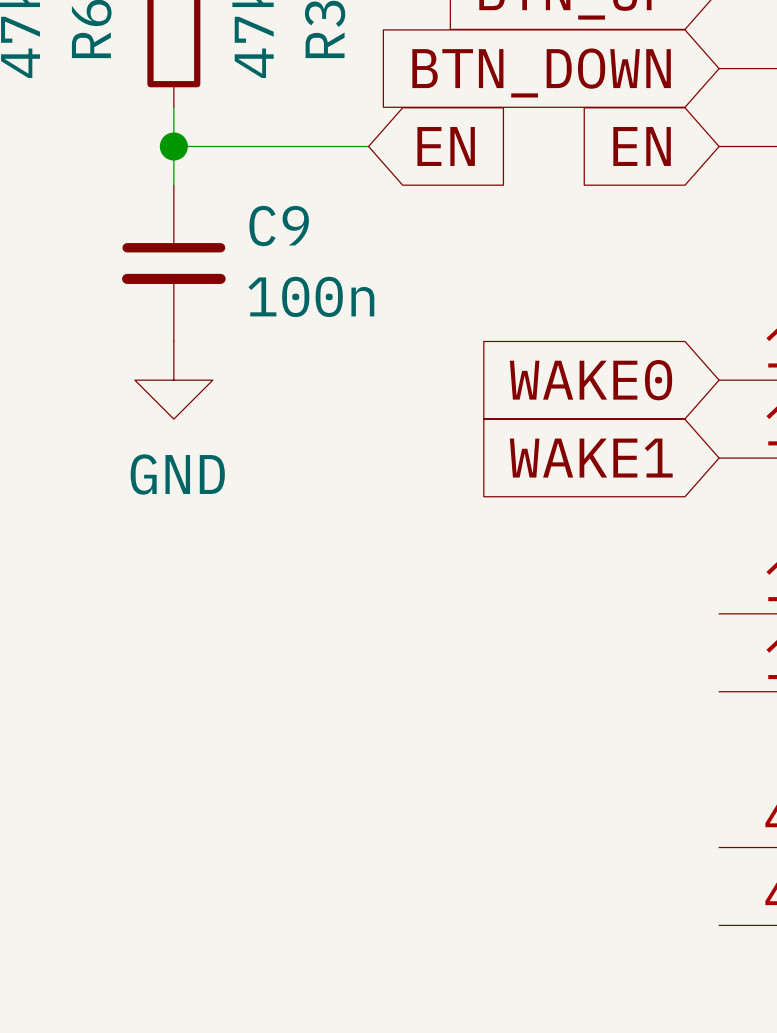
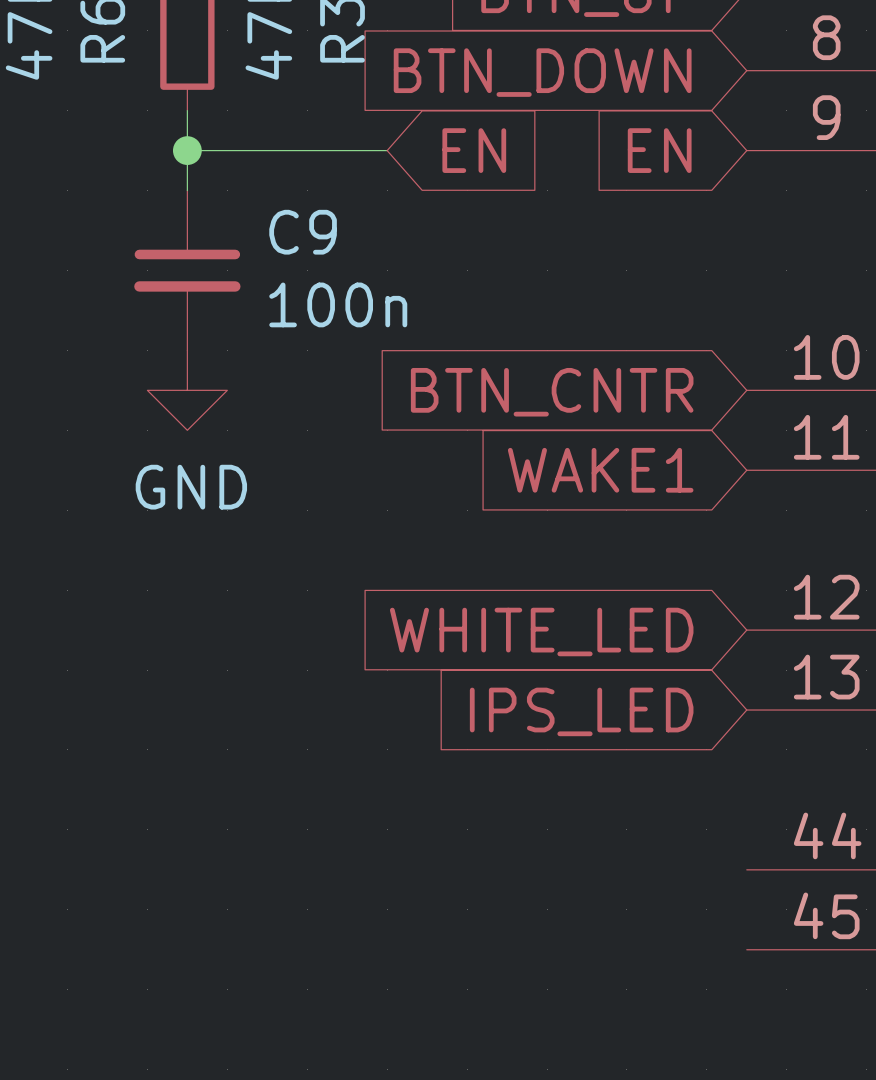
global label: WAKE0 (591, 380) -> BTN_CNTR (552, 392)
global label: none -> WHITE_LED (541, 632)
global label: none -> IPS_LED (581, 711)

